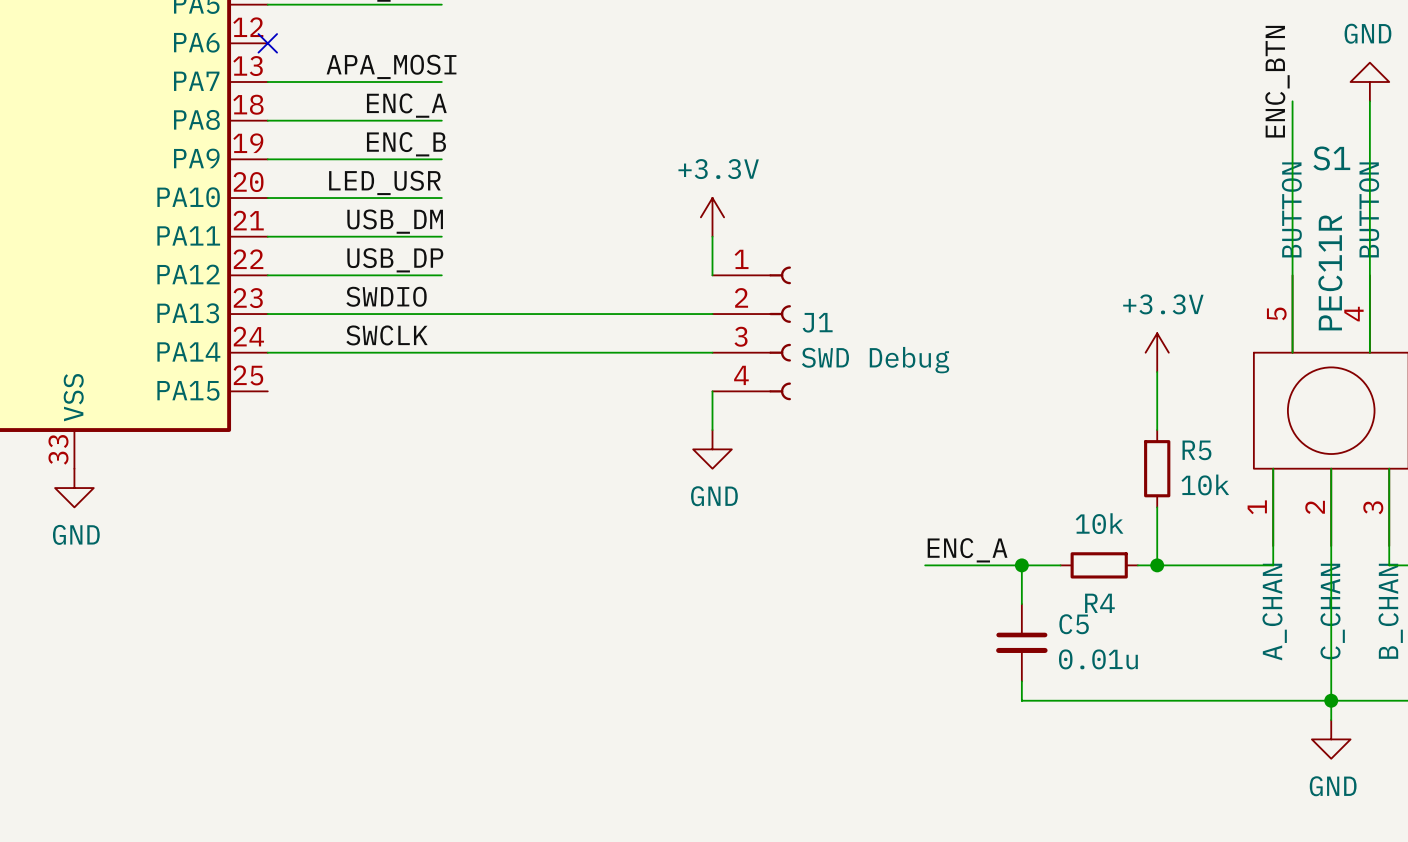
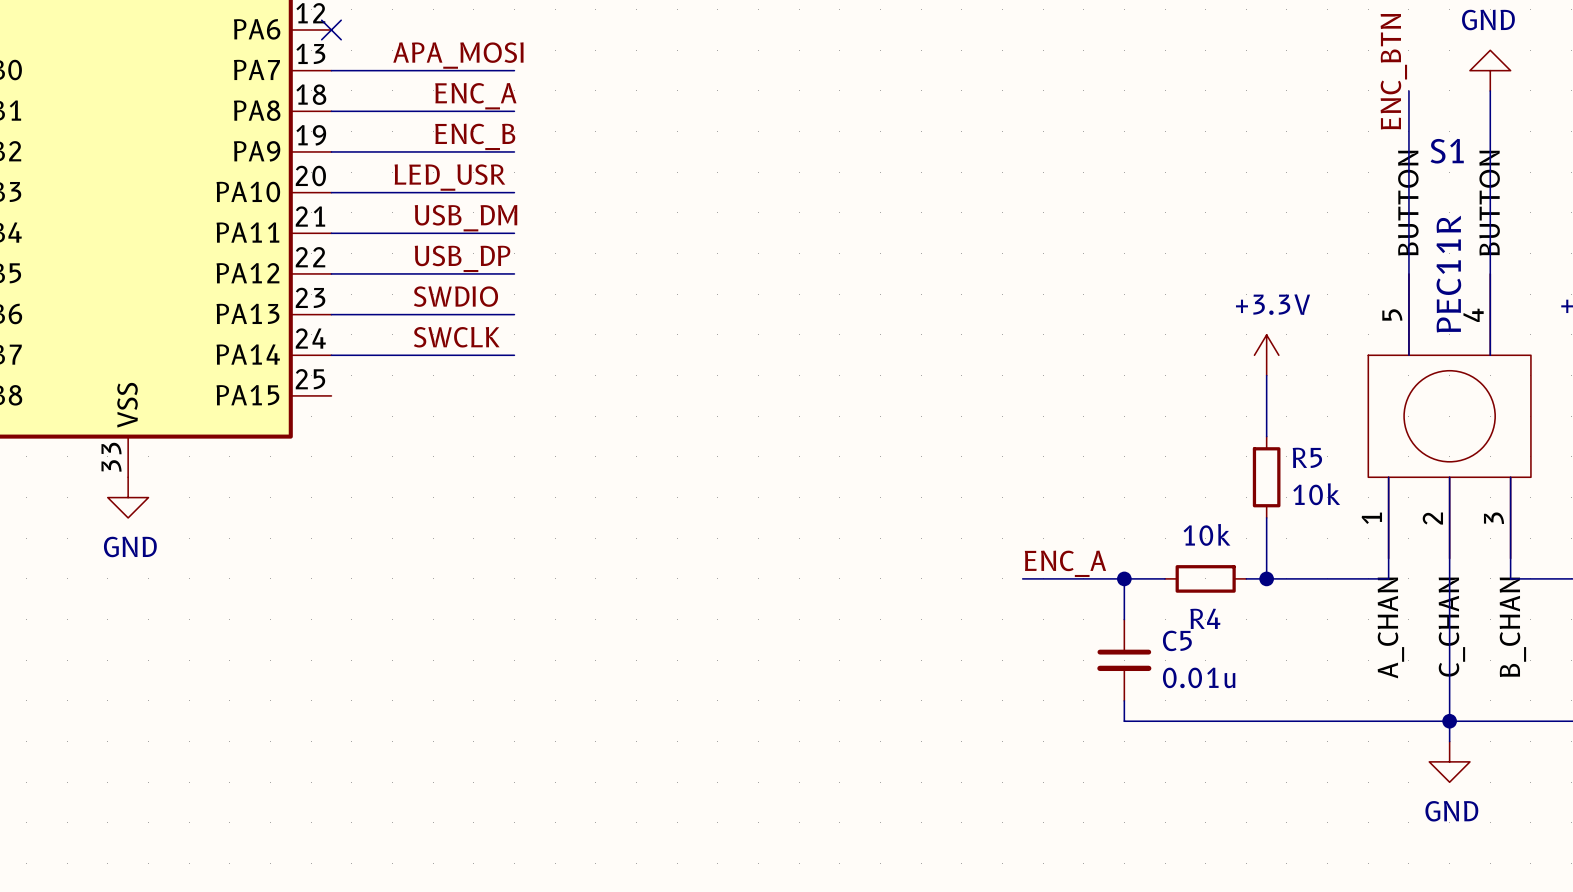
power symbol: +3.3V (712, 217) -> none
wire: (712, 236) (712, 275) -> none
wire: (441, 314) (712, 314) -> none
J1: SWD Debug (751, 333) -> none
wire: (441, 352) (712, 352) -> none
wire: (712, 391) (712, 430) -> none
power symbol: GND (712, 449) -> none

